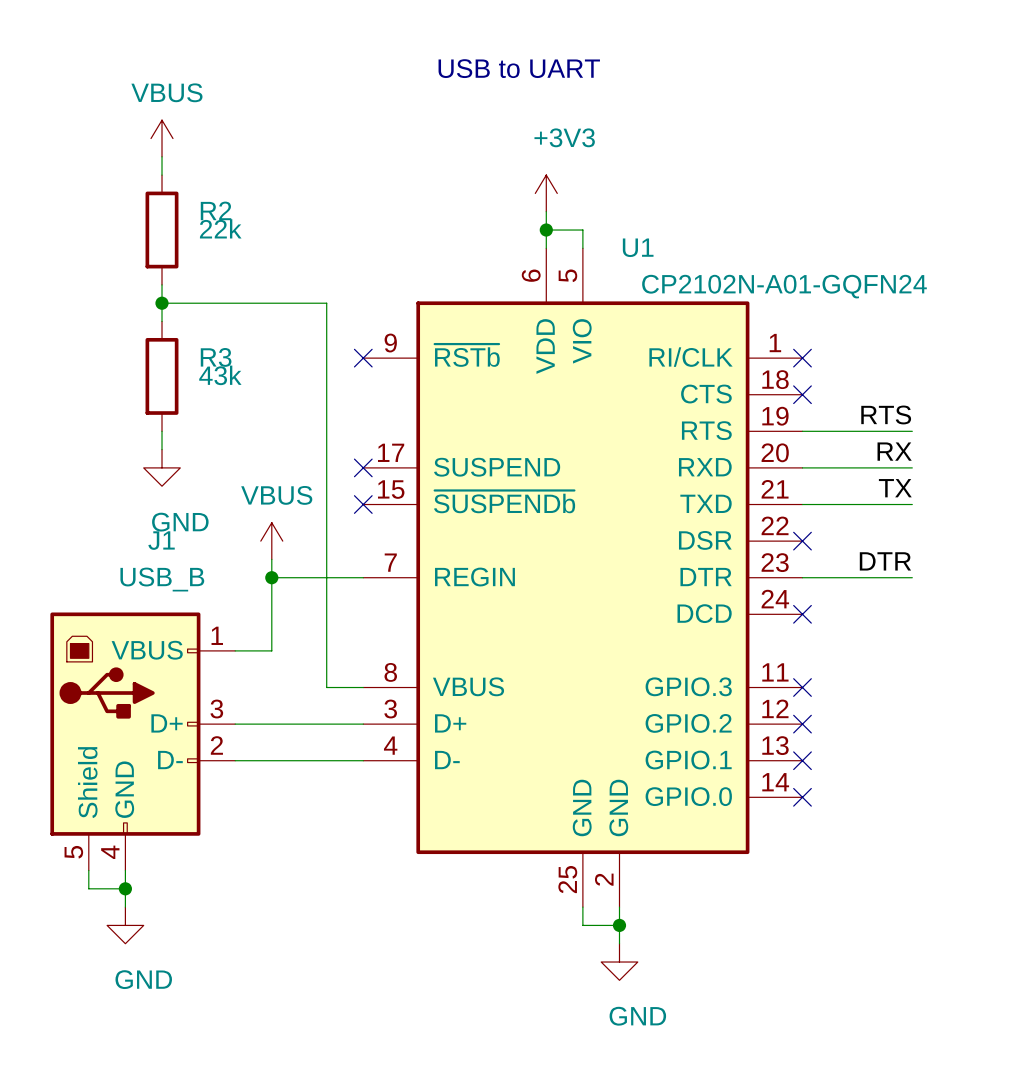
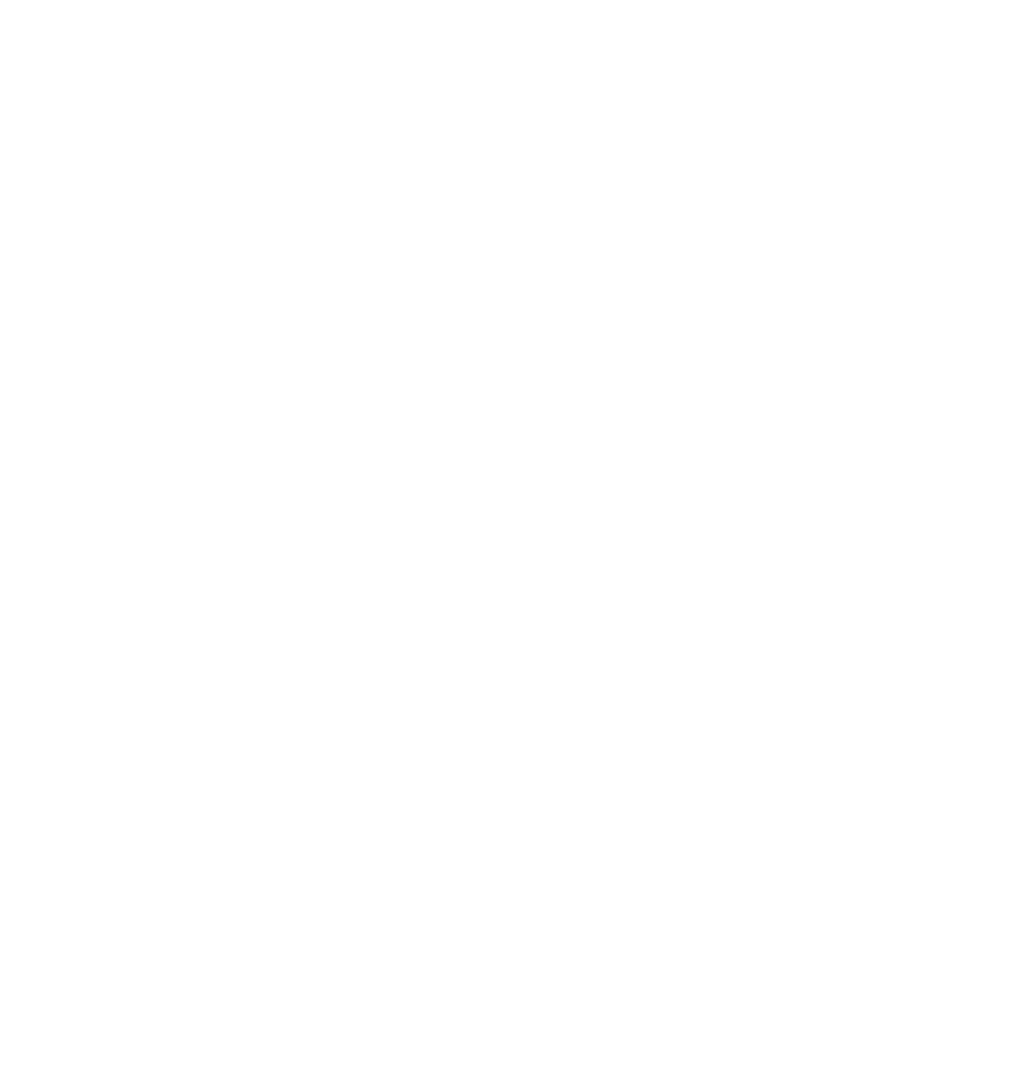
text: USB to UART (519, 68) -> none
power symbol: VBUS (162, 138) -> none
wire: (162, 156) (162, 175) -> none
power symbol: +3V3 (546, 193) -> none
wire: (546, 211) (546, 248) -> none
R2: 22k (162, 230) -> none
wire: (546, 230) (582, 230) (582, 248) -> none
junction: (546, 230) -> none
wire: (162, 284) (162, 321) -> none
wire: (162, 303) (326, 303) (326, 687) (363, 687) -> none
junction: (162, 303) -> none
no-connect mark: (363, 358) -> none
no-connect mark: (802, 358) -> none
R3: 43k (162, 376) -> none
no-connect mark: (802, 394) -> none
label: RTS (886, 414) -> none
wire: (162, 431) (162, 449) -> none
wire: (802, 431) (912, 431) -> none
label: RX (894, 451) -> none
power symbol: GND (162, 467) -> none
no-connect mark: (363, 467) -> none
wire: (802, 467) (912, 467) -> none
label: TX (895, 488) -> none
no-connect mark: (363, 504) -> none
wire: (802, 504) (912, 504) -> none
power symbol: VBUS (271, 541) -> none
no-connect mark: (802, 541) -> none
wire: (271, 559) (271, 650) (235, 650) -> none
label: DTR (885, 561) -> none
wire: (271, 577) (363, 577) -> none
junction: (271, 577) -> none
U1: CP2102N-A01-GQFN24 (582, 577) -> none
wire: (802, 577) (912, 577) -> none
no-connect mark: (802, 614) -> none
no-connect mark: (802, 687) -> none
wire: (235, 724) (363, 724) -> none
no-connect mark: (802, 724) -> none
J1: USB_B (142, 741) -> none
wire: (235, 760) (363, 760) -> none
no-connect mark: (802, 760) -> none
no-connect mark: (802, 797) -> none
wire: (88, 870) (88, 888) (125, 888) -> none
wire: (125, 870) (125, 907) -> none
junction: (125, 888) -> none
wire: (582, 907) (582, 925) (619, 925) -> none
wire: (619, 907) (619, 943) -> none
power symbol: GND (125, 925) -> none
junction: (619, 925) -> none
power symbol: GND (619, 962) -> none

